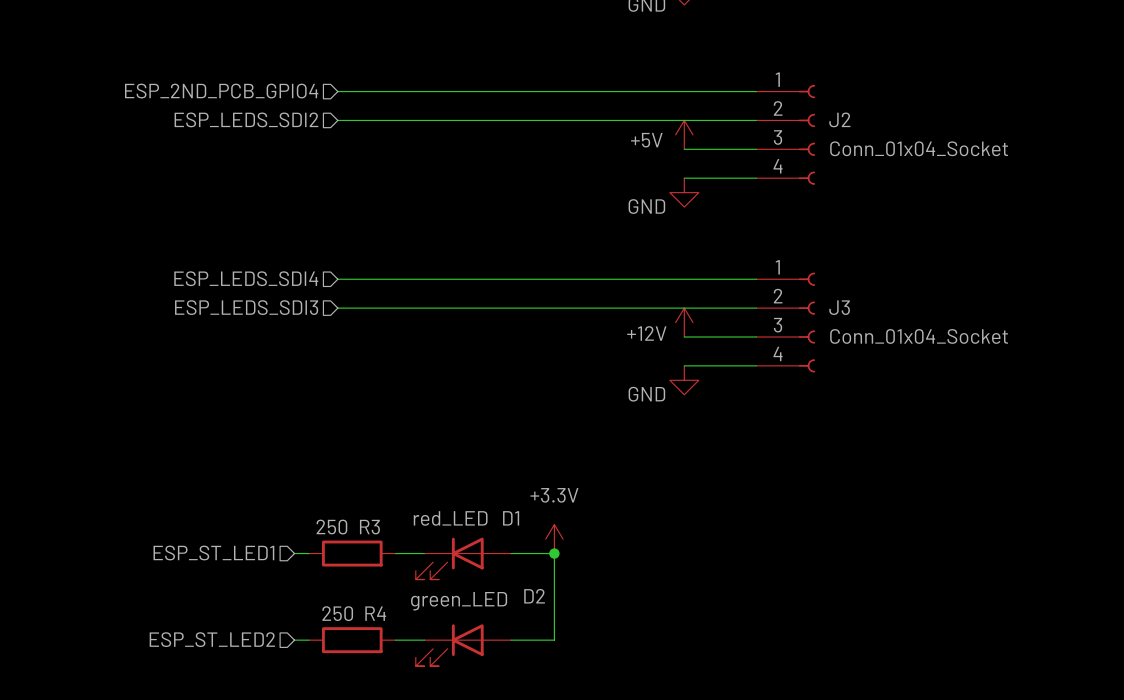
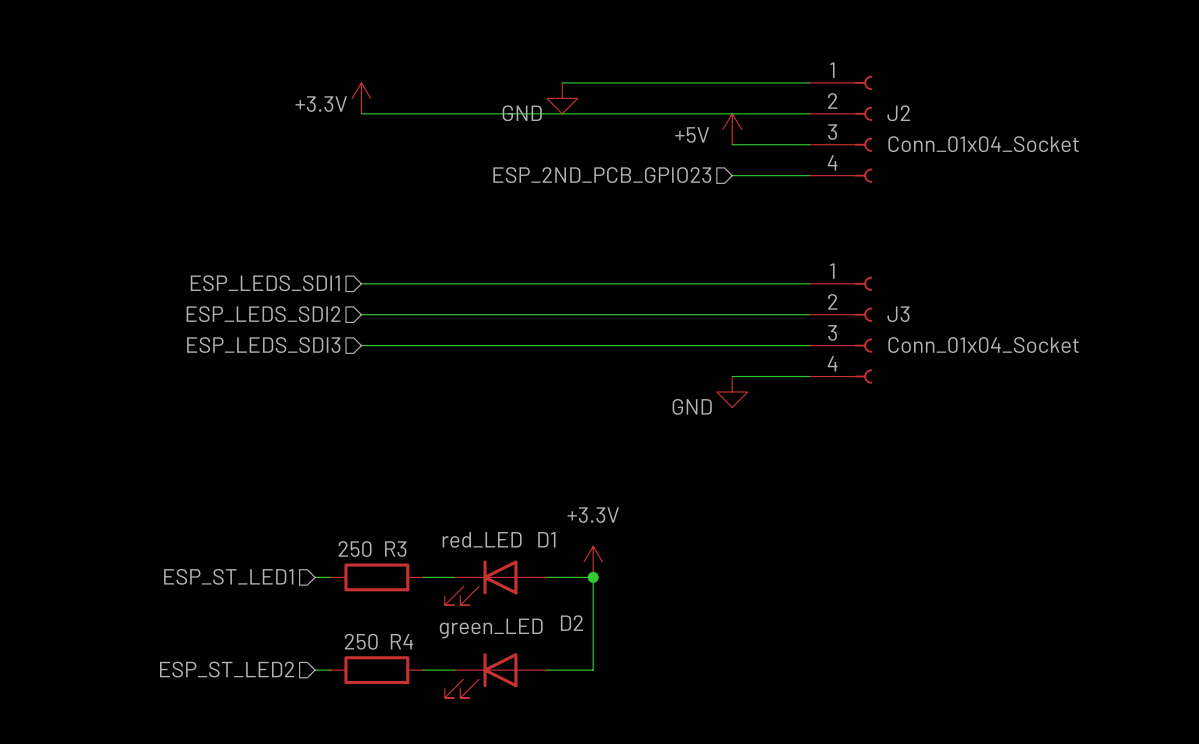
hierarchical label: ESP_2ND_PCB_GPIO4 (221, 91) -> none
wire: (337, 91) (525, 91) -> none
power symbol: none -> +3.3V (361, 98)
hierarchical label: ESP_LEDS_SDI2 (246, 119) -> none
hierarchical label: none -> ESP_2ND_PCB_GPIO23 (602, 175)
power symbol position: GND (684, 192) -> GND (562, 98)
hierarchical label: ESP_LEDS_SDI4 (246, 278) -> ESP_LEDS_SDI1 (265, 283)
hierarchical label: ESP_LEDS_SDI3 (246, 307) -> ESP_LEDS_SDI2 (263, 314)
power symbol: +12V (684, 322) -> none
hierarchical label: none -> ESP_LEDS_SDI3 (263, 345)
wire: none -> (361, 345) (732, 345)

